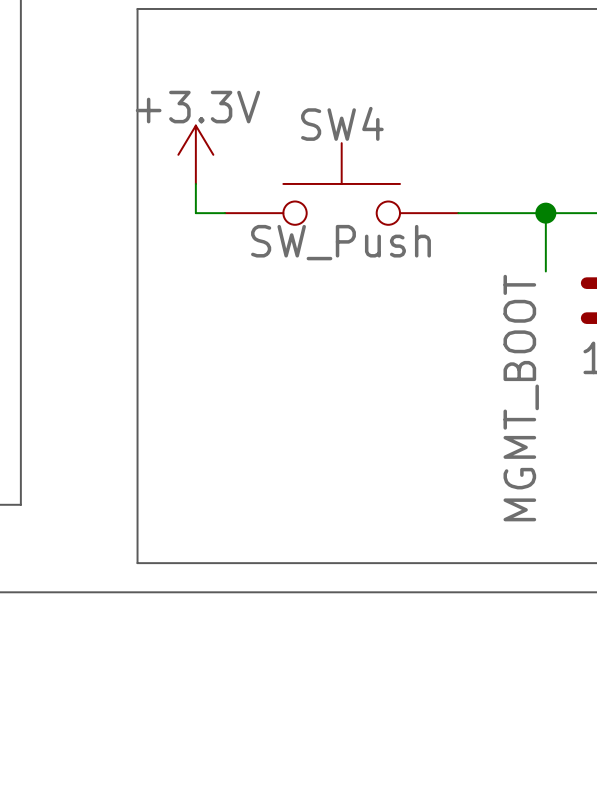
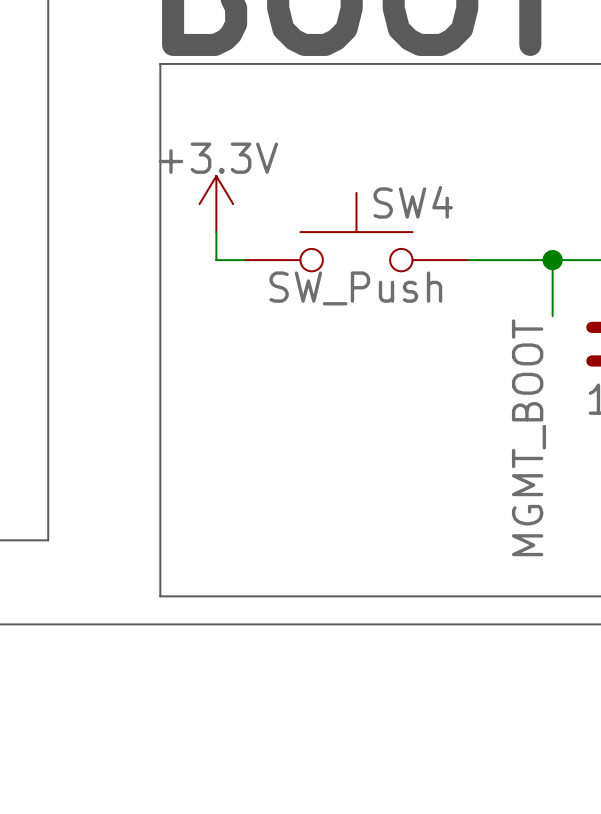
SW4 name position: SW4 (342, 123) -> SW4 (413, 202)

